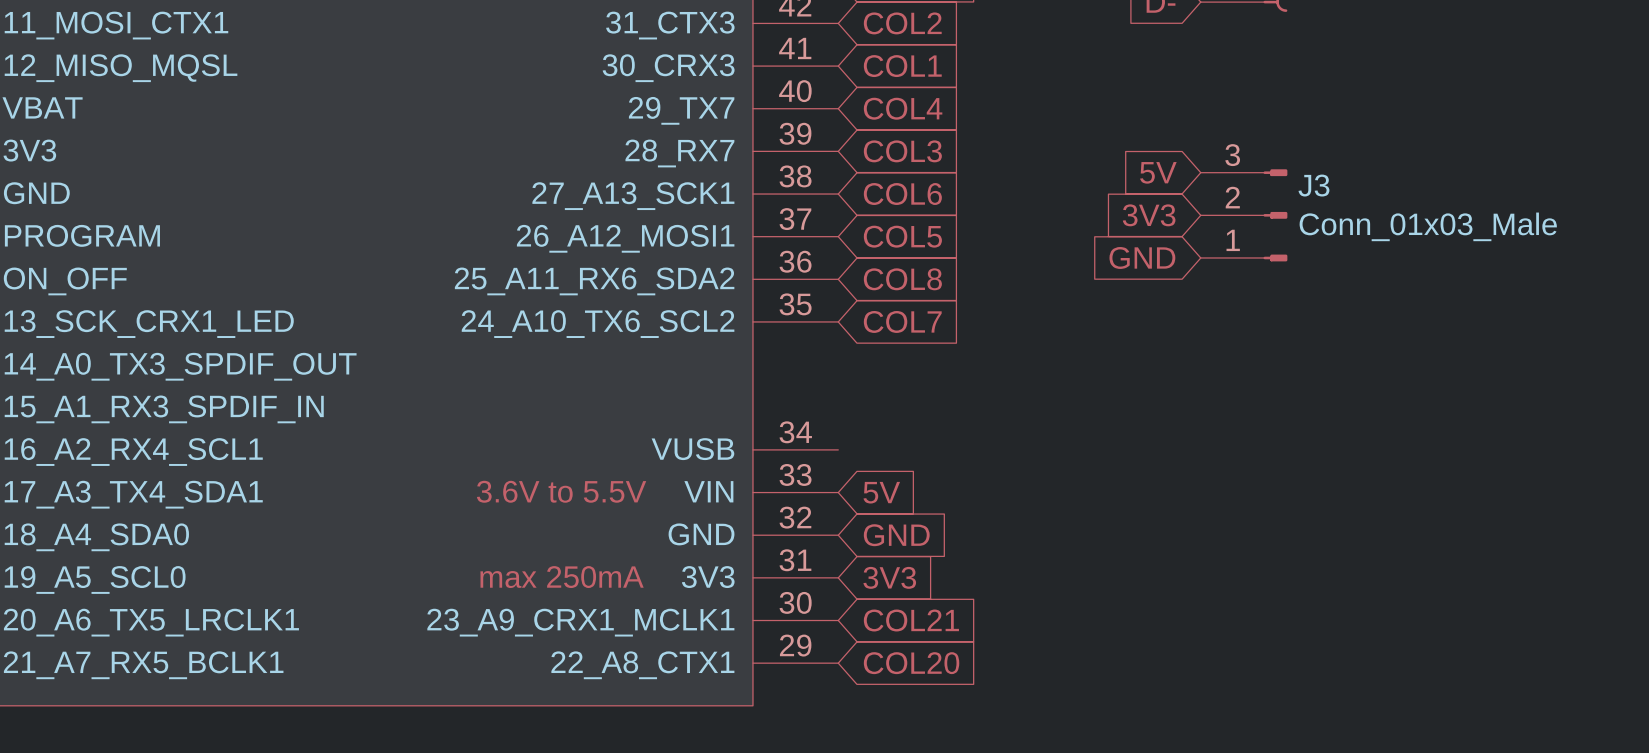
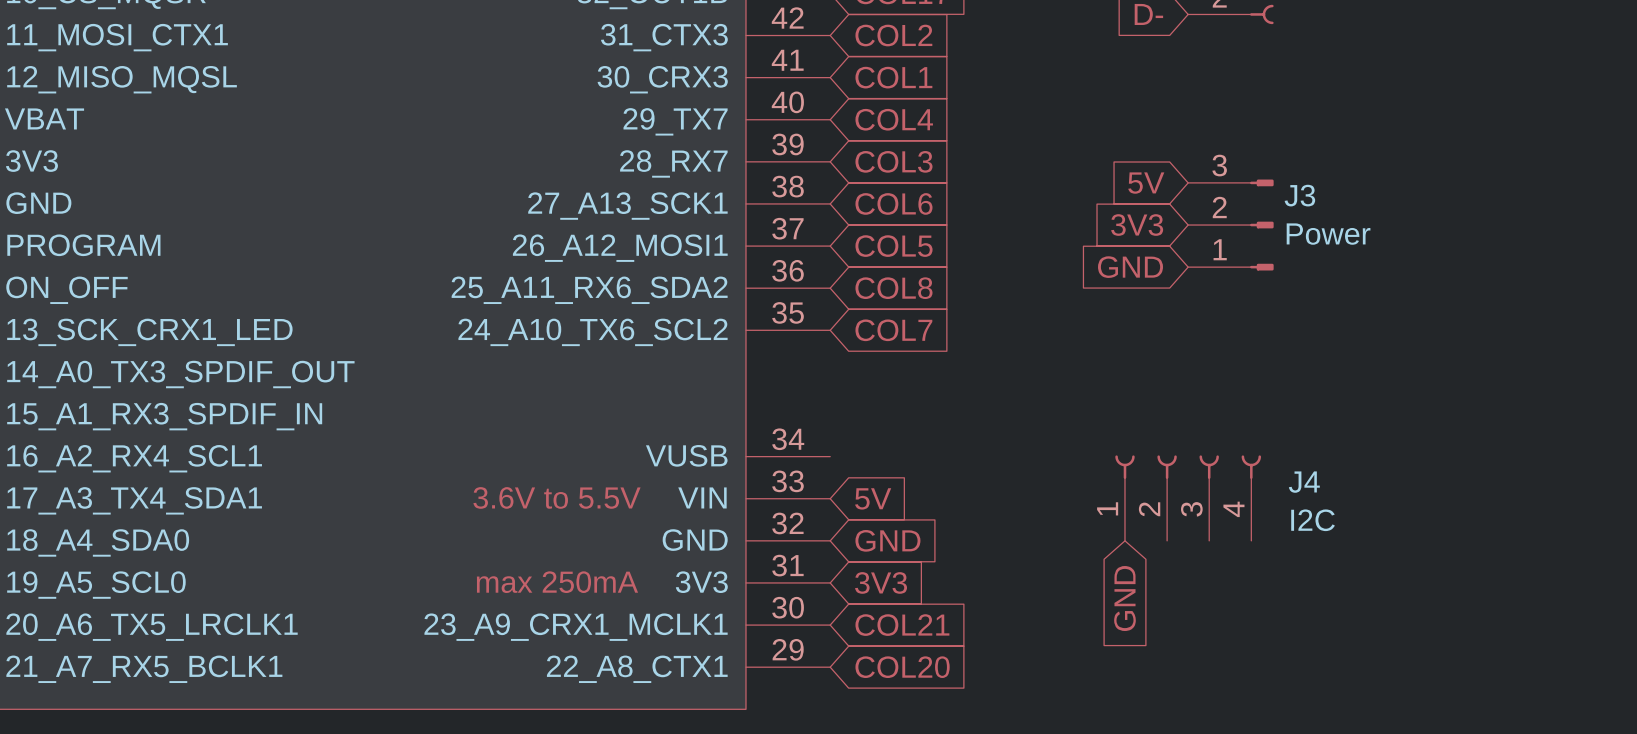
J3 value: Conn_01x03_Male (1428, 226) -> Power (1328, 234)
J4: none -> I2C (1188, 498)
global label: none -> GND (1124, 598)

